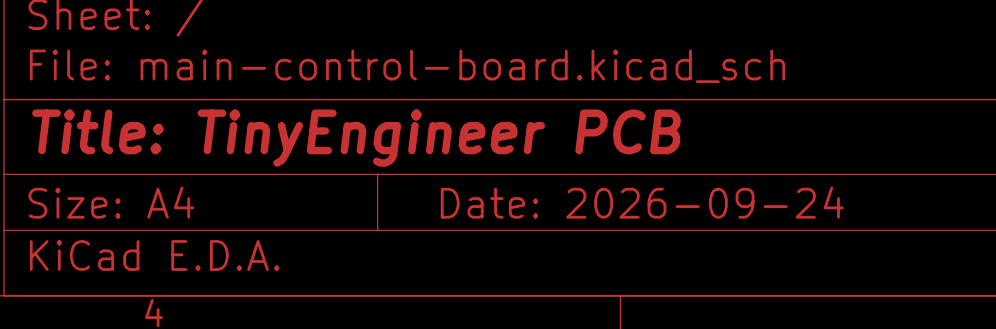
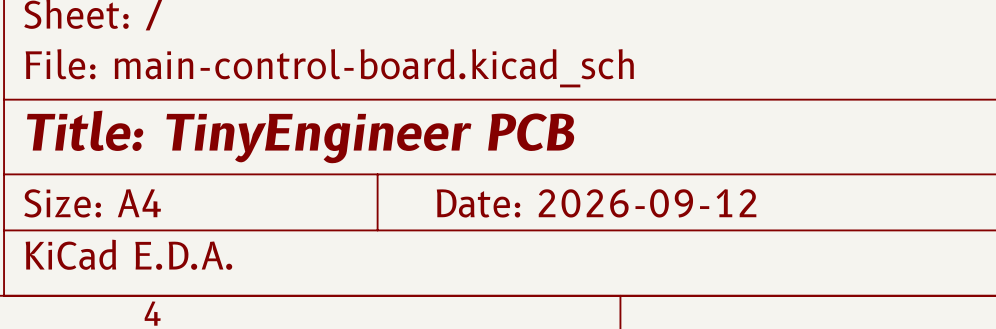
title block: Date: 2026-09-24 (642, 202) -> Date: 2026-09-12 (596, 203)

